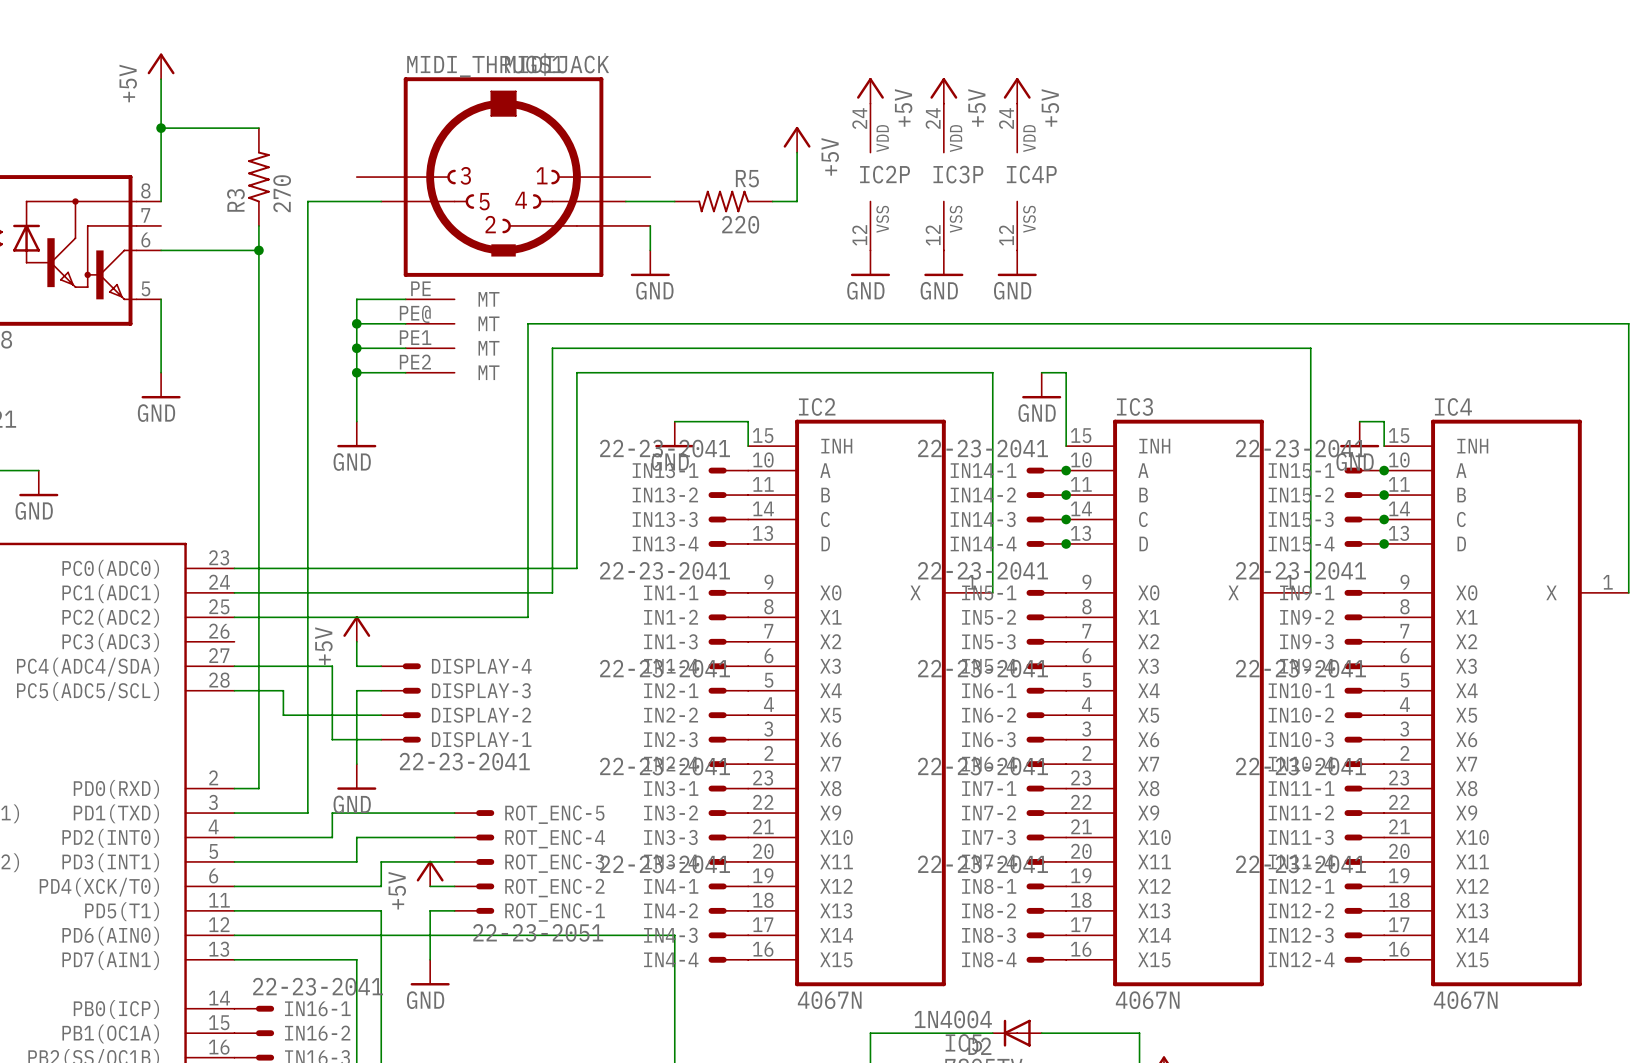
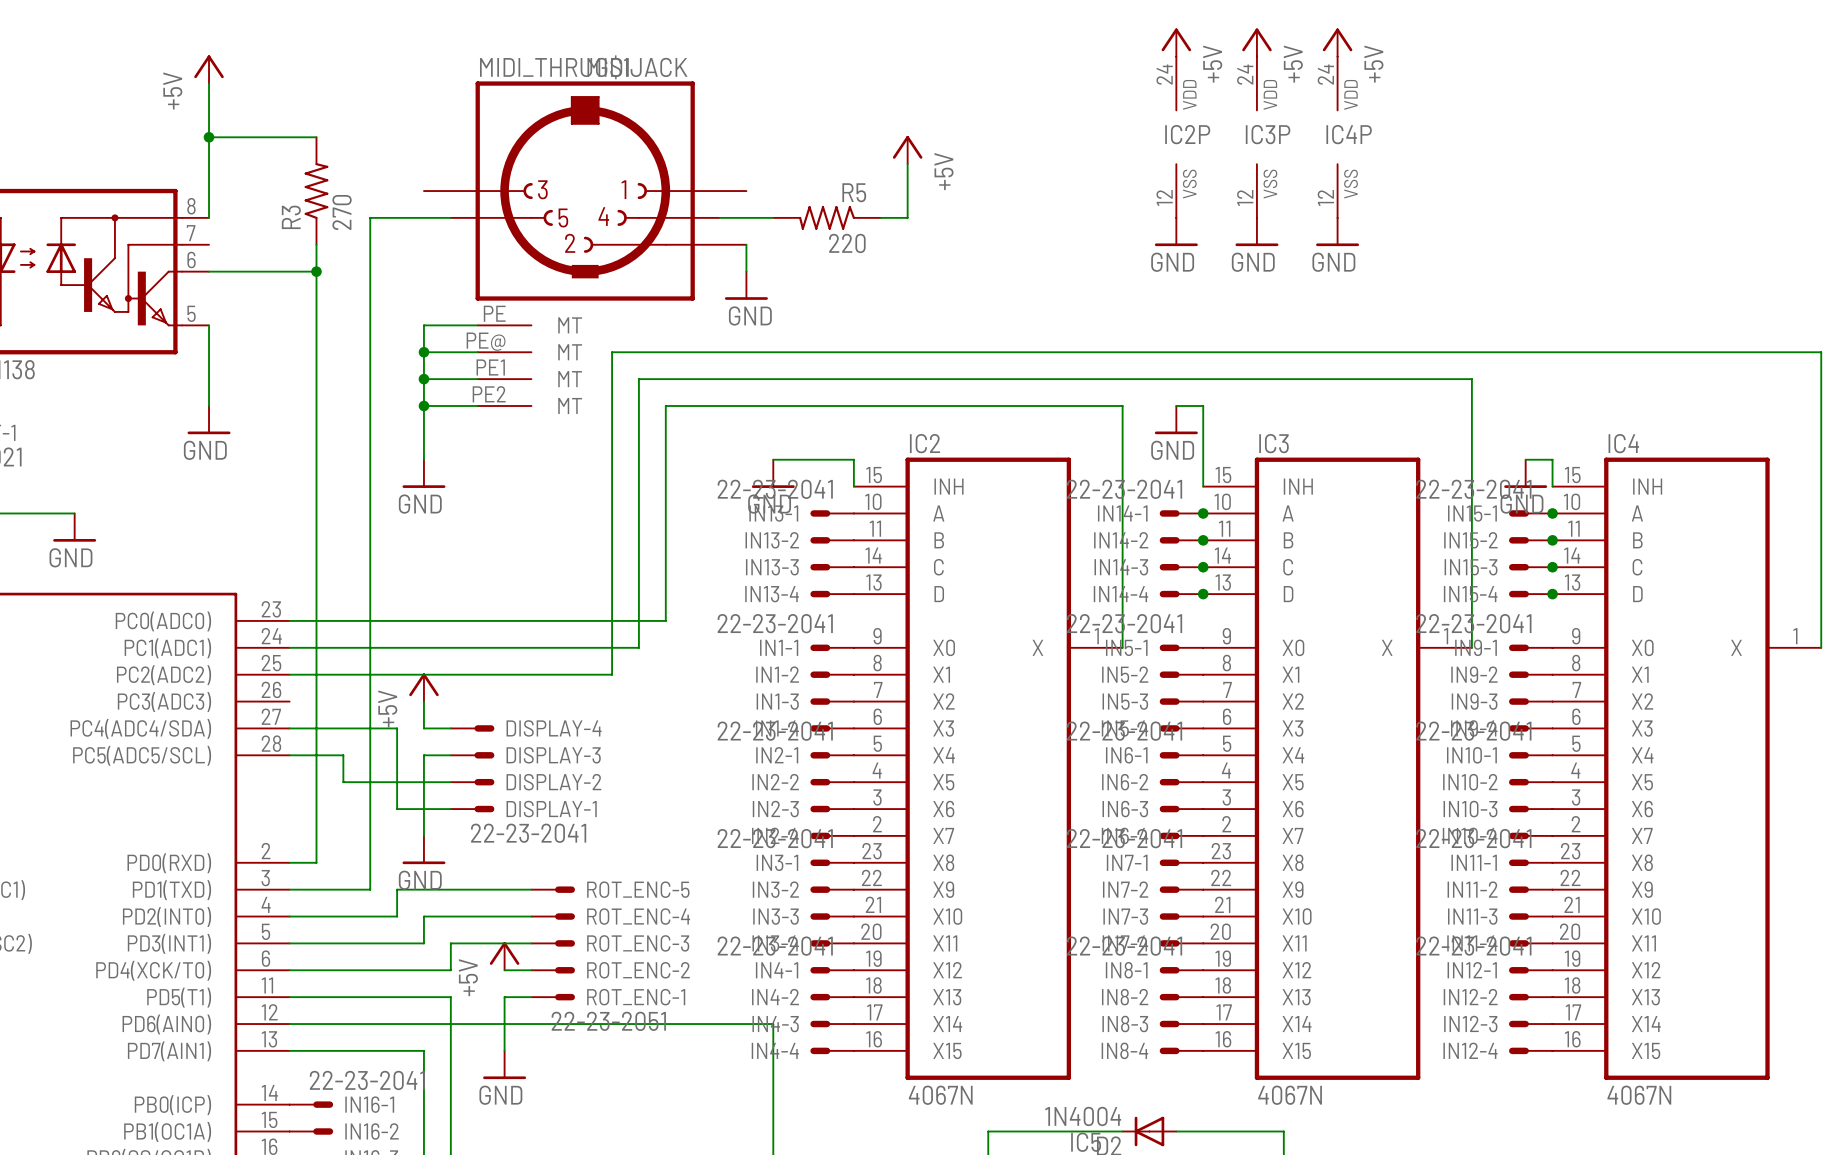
power symbol: none -> +5V (1176, 42)
power symbol: none -> +5V (1256, 42)
power symbol: none -> +5V (1337, 42)
power symbol: +5V (870, 90) -> none
power symbol: +5V (943, 90) -> none
power symbol: +5V (1017, 90) -> none
IC2P position: (870, 177) -> (1176, 137)
IC3P position: (943, 177) -> (1256, 137)
IC4P position: (1017, 177) -> (1337, 137)
power symbol: none -> GND (1176, 232)
power symbol: none -> GND (1256, 232)
power symbol: none -> GND (1337, 232)
power symbol: GND (870, 263) -> none
power symbol: GND (943, 263) -> none
power symbol: GND (1017, 263) -> none

